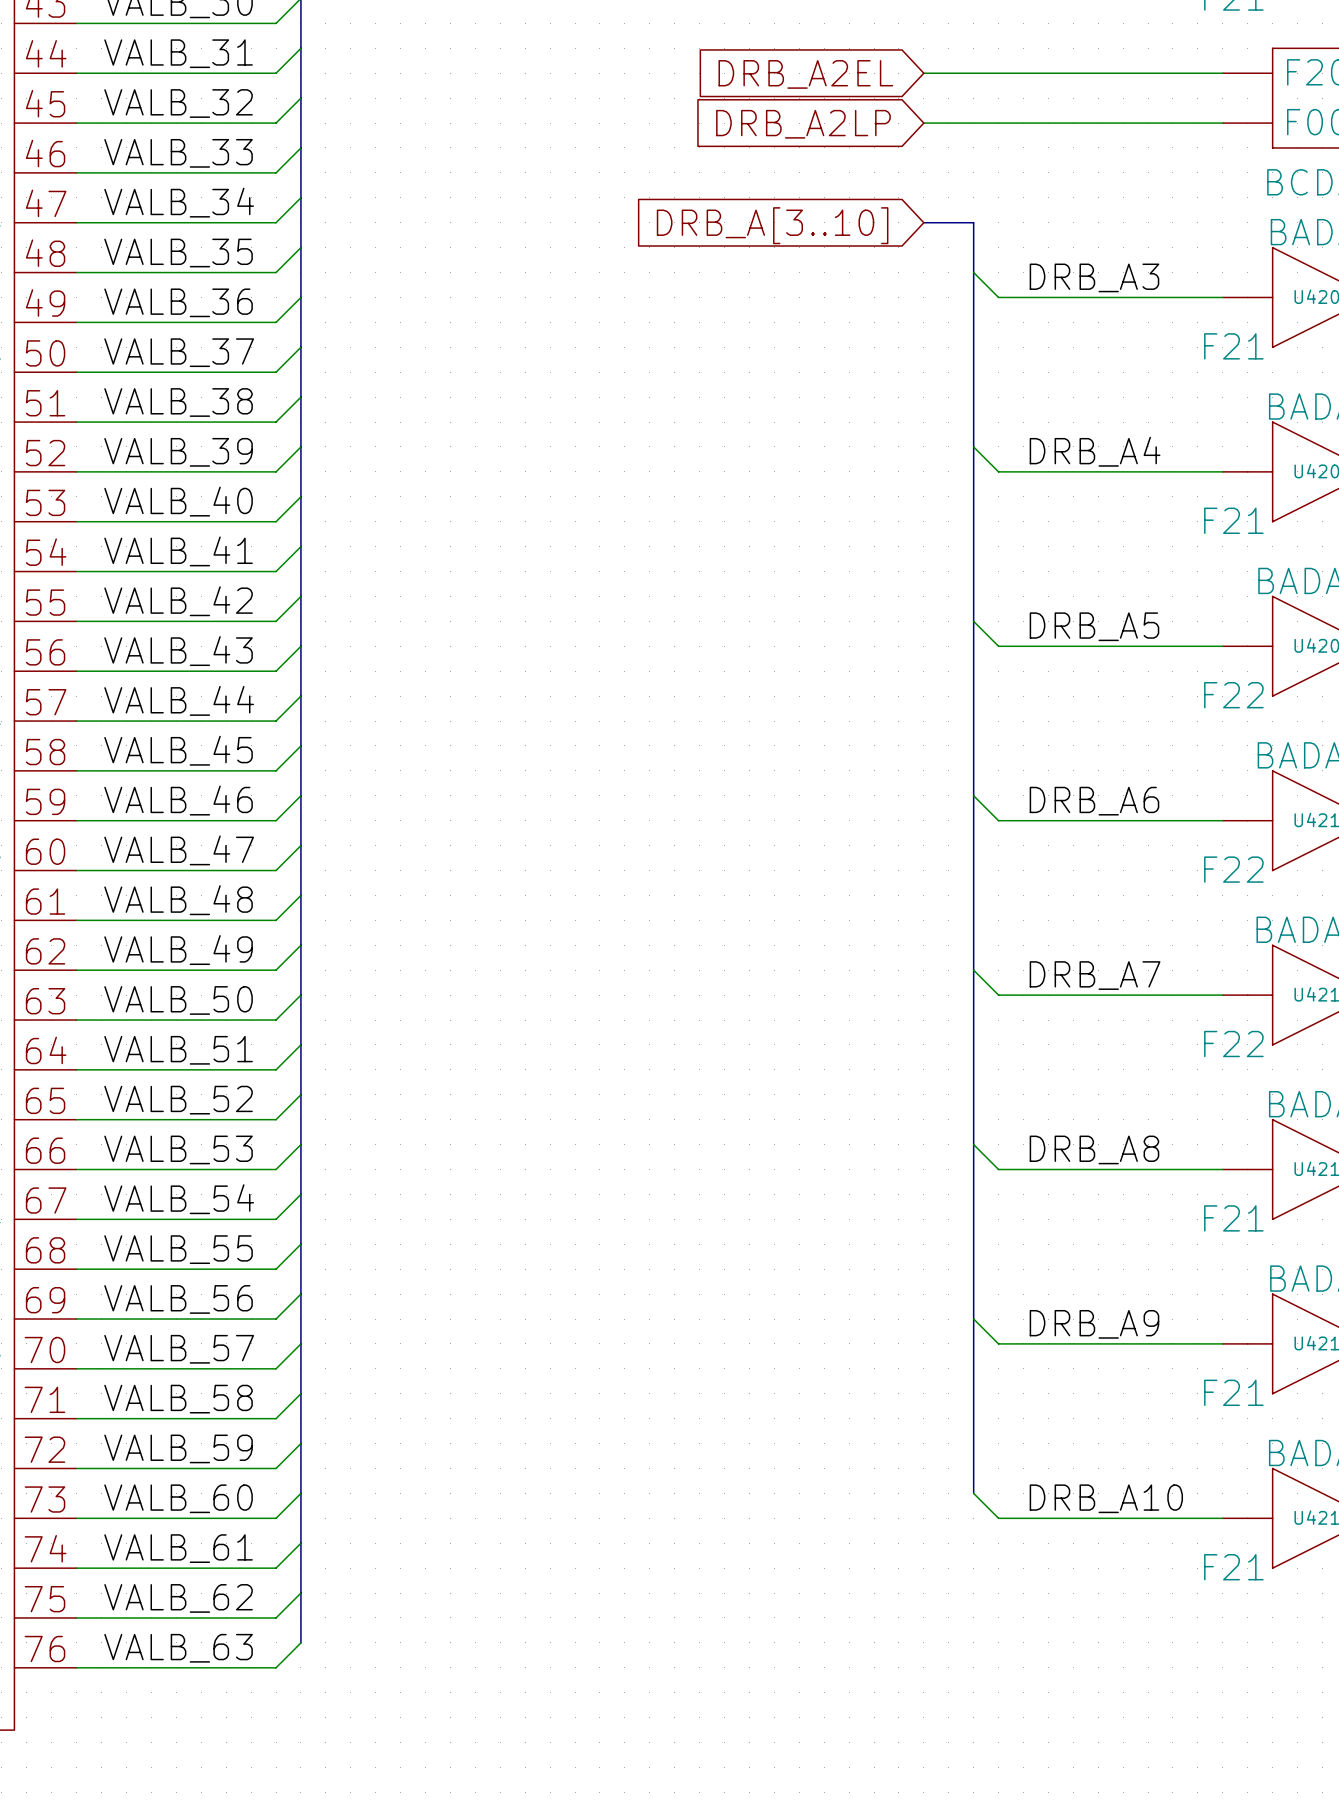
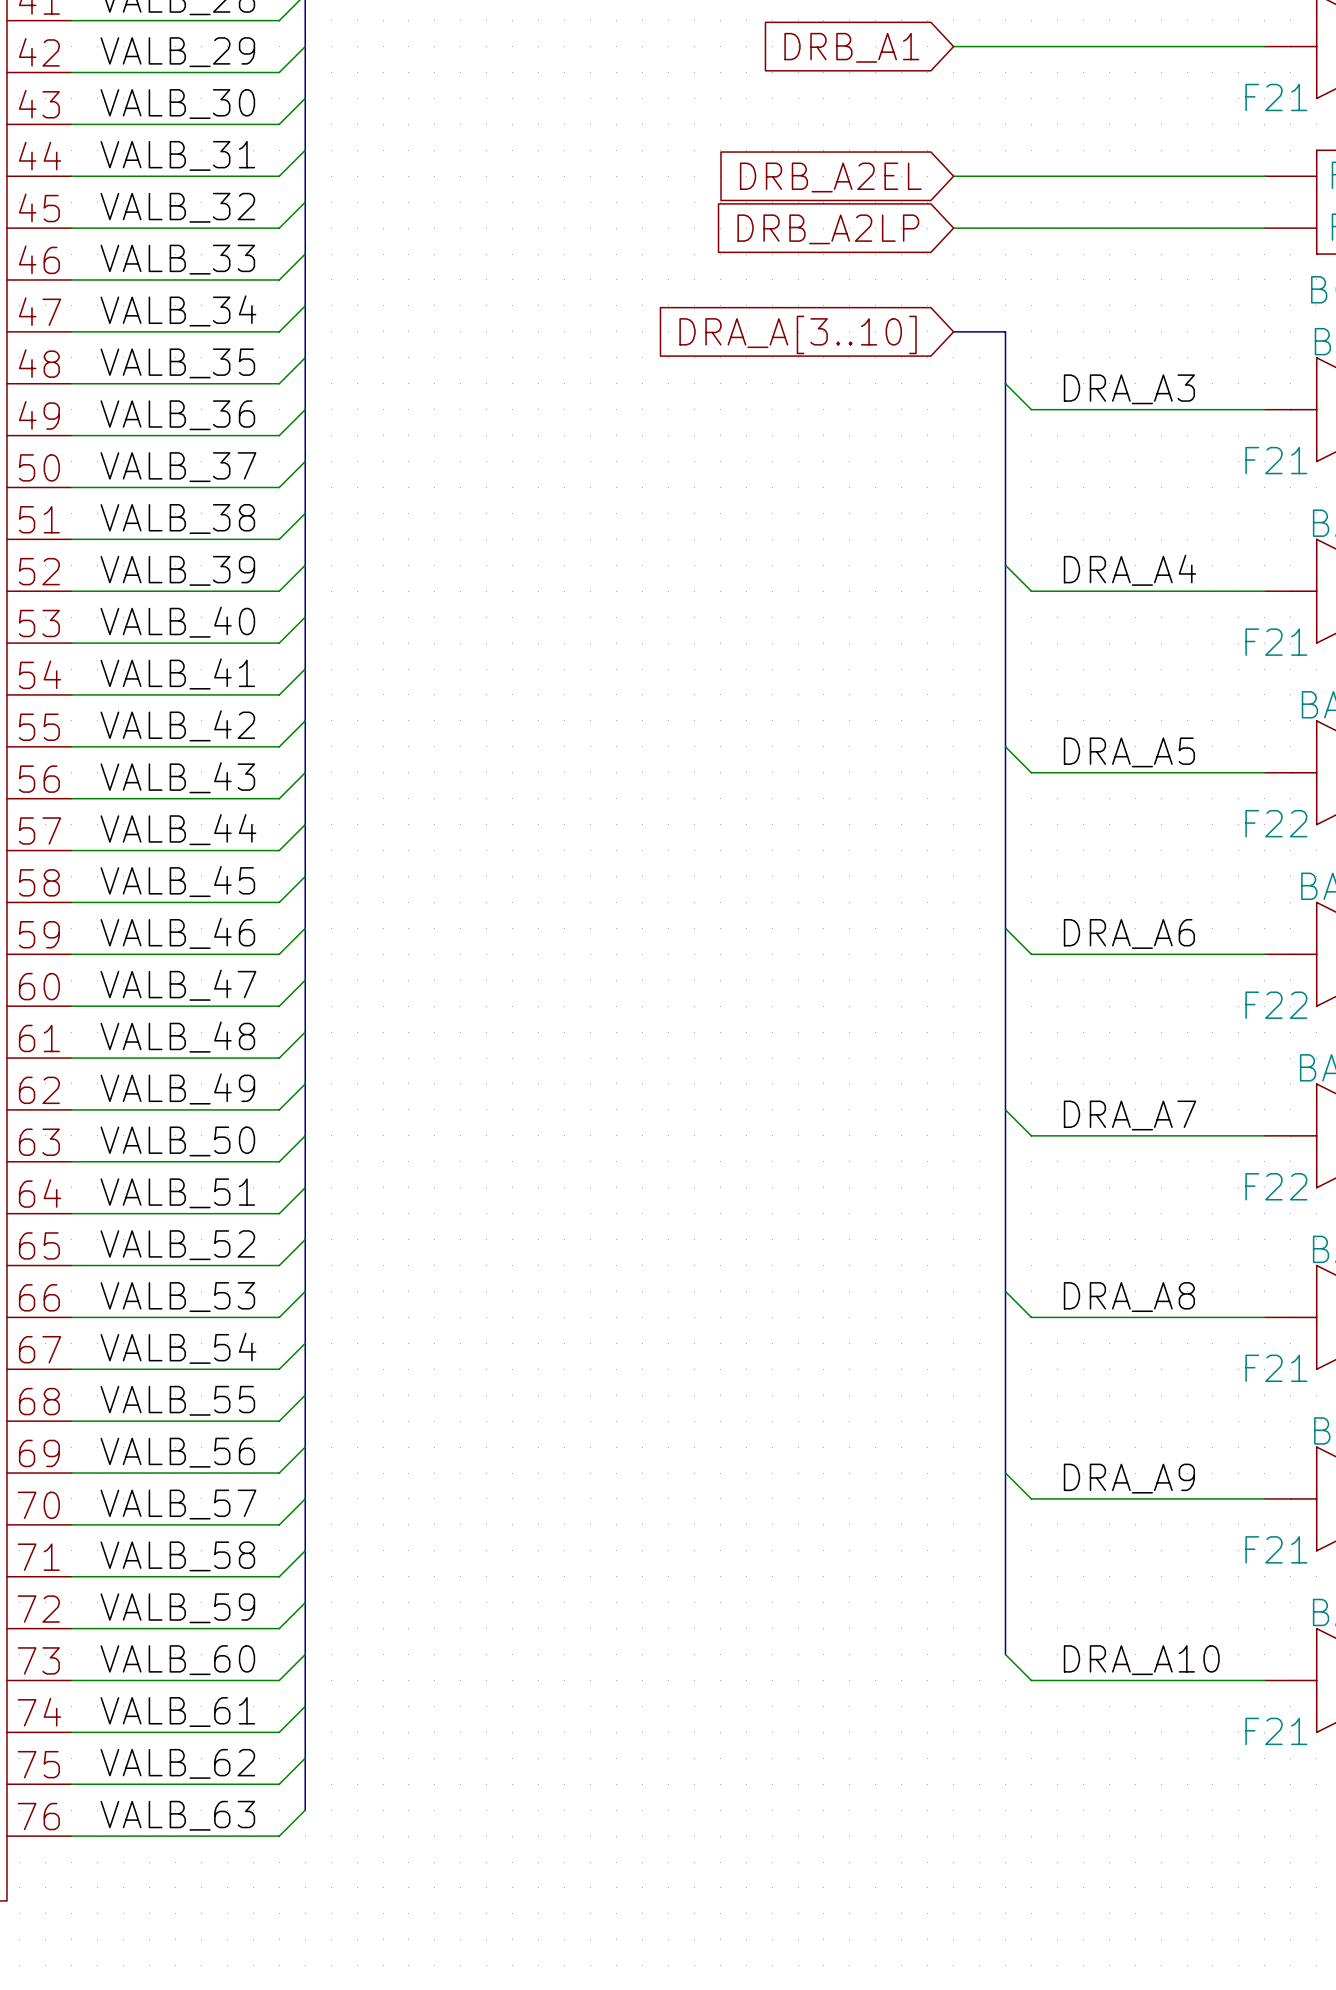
global label: DRB_A[3..10] (772, 225) -> DRA_A[3..10] (798, 334)
label: DRB_A3 (1094, 277) -> DRA_A3 (1129, 389)
label: DRB_A4 (1095, 451) -> DRA_A4 (1130, 570)
label: DRB_A5 (1094, 626) -> DRA_A5 (1129, 752)
label: DRB_A6 (1094, 801) -> DRA_A6 (1129, 933)
label: DRB_A7 (1095, 975) -> DRA_A7 (1130, 1115)
label: DRB_A8 (1094, 1149) -> DRA_A8 (1129, 1297)
label: DRB_A9 (1094, 1324) -> DRA_A9 (1129, 1478)
label: DRB_A10 (1106, 1498) -> DRA_A10 (1141, 1660)

